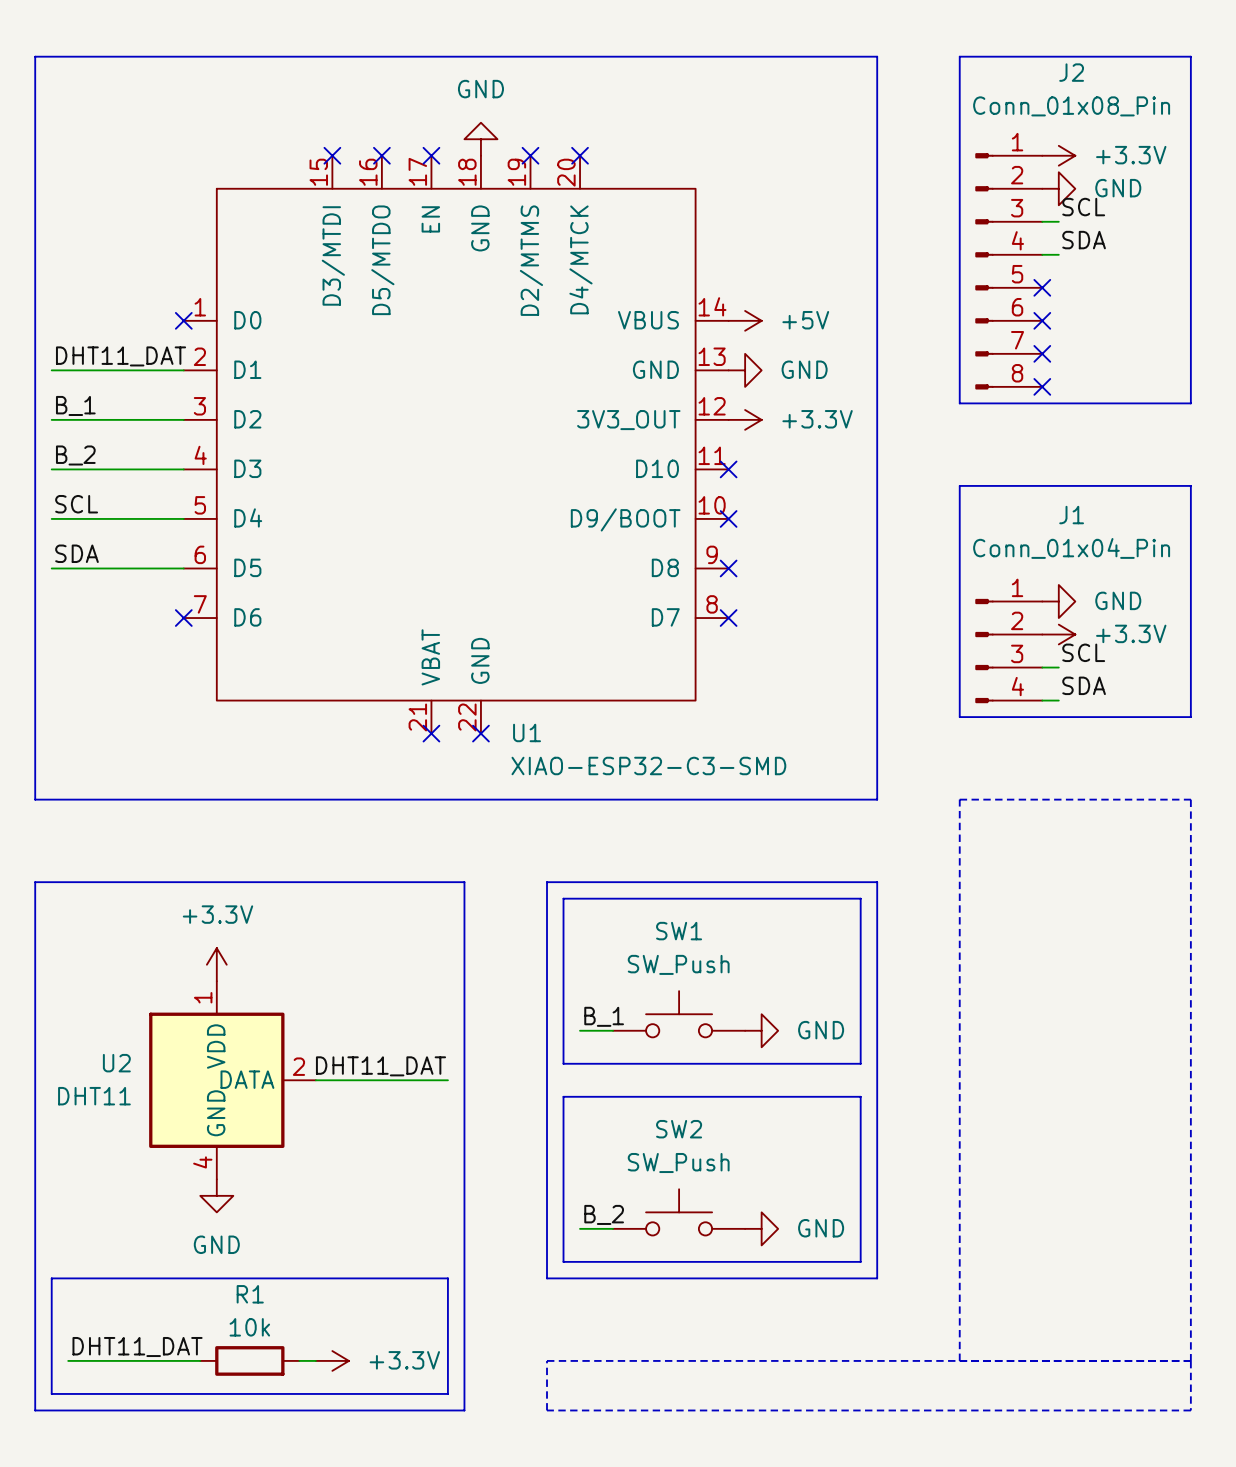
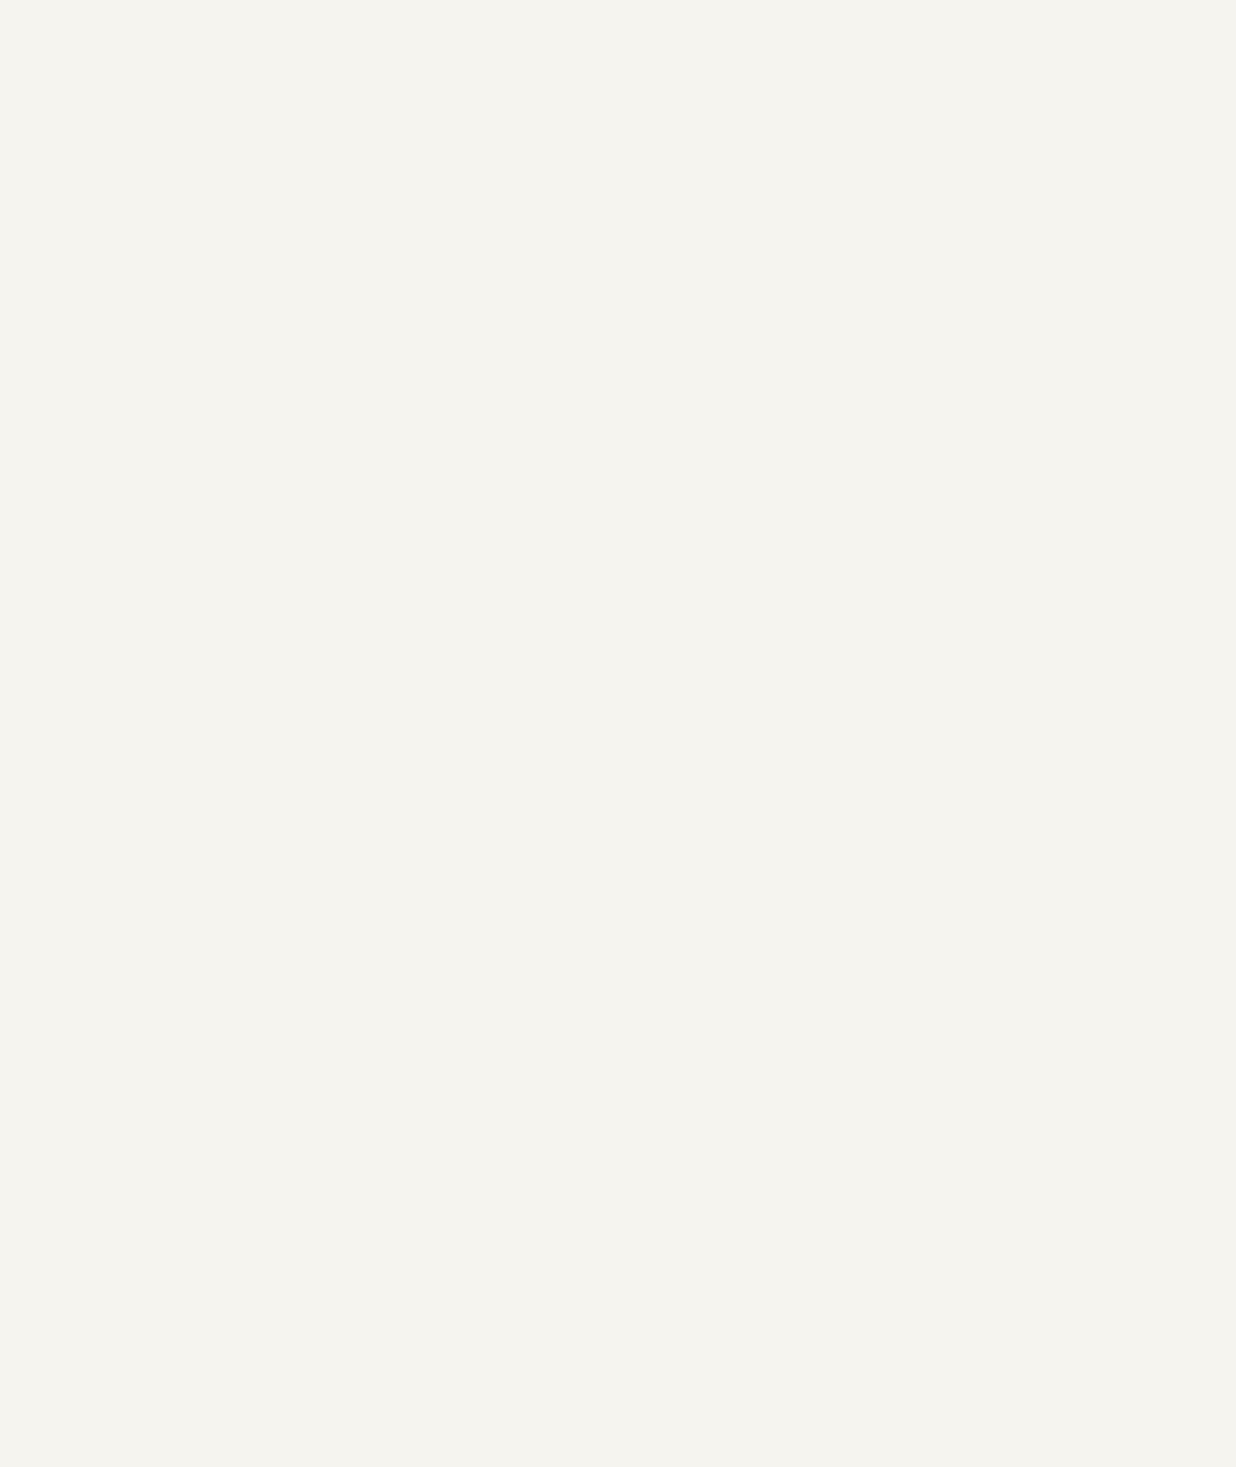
line: (35, 56) (877, 56) (877, 799) (35, 799) (35, 56) -> none
line: (959, 56) (1190, 56) (1190, 403) (959, 403) (959, 56) -> none
power symbol: GND (480, 139) -> none
no-connect mark: (332, 155) -> none
no-connect mark: (381, 155) -> none
no-connect mark: (431, 155) -> none
no-connect mark: (530, 155) -> none
no-connect mark: (580, 155) -> none
power symbol: +3.3V (1058, 155) -> none
power symbol: GND (1058, 188) -> none
label: SCL (1083, 207) -> none
wire: (1042, 221) (1058, 221) -> none
label: SDA (1084, 240) -> none
wire: (1042, 254) (1058, 254) -> none
J2: Conn_01x08_Pin (1008, 271) -> none
no-connect mark: (1042, 287) -> none
no-connect mark: (183, 320) -> none
power symbol: +5V (745, 320) -> none
no-connect mark: (1042, 320) -> none
no-connect mark: (1042, 353) -> none
label: DHT11_DAT (121, 356) -> none
wire: (51, 370) (183, 370) -> none
power symbol: GND (745, 370) -> none
no-connect mark: (1042, 386) -> none
label: B_1 (75, 405) -> none
wire: (51, 419) (183, 419) -> none
power symbol: +3.3V (745, 419) -> none
U1: XIAO-ESP32-C3-SMD (456, 444) -> none
label: B_2 (75, 455) -> none
wire: (51, 469) (183, 469) -> none
no-connect mark: (728, 469) -> none
line: (959, 485) (959, 717) (1190, 717) (1190, 485) (959, 485) -> none
label: SCL (76, 504) -> none
wire: (51, 518) (183, 518) -> none
no-connect mark: (728, 518) -> none
label: SDA (77, 553) -> none
wire: (51, 568) (183, 568) -> none
no-connect mark: (728, 568) -> none
power symbol: GND (1058, 601) -> none
no-connect mark: (183, 618) -> none
no-connect mark: (728, 618) -> none
power symbol: +3.3V (1058, 634) -> none
J1: Conn_01x04_Pin (1008, 651) -> none
label: SCL (1083, 652) -> none
wire: (1042, 667) (1058, 667) -> none
label: SDA (1084, 685) -> none
wire: (1042, 700) (1058, 700) -> none
no-connect mark: (431, 733) -> none
no-connect mark: (480, 733) -> none
line: (35, 882) (35, 1410) (464, 1410) (464, 882) (35, 882) -> none
line: (547, 882) (877, 882) (877, 1278) (547, 1278) (547, 882) -> none
line: (563, 898) (563, 1063) (860, 1063) (860, 898) (563, 898) -> none
power symbol: +3.3V (216, 964) -> none
SW1: SW_Push (679, 1014) -> none
label: B_1 (604, 1016) -> none
wire: (580, 1030) (613, 1030) -> none
power symbol: GND (761, 1030) -> none
label: DHT11_DAT (381, 1066) -> none
U2: DHT11 (232, 1080) -> none
wire: (315, 1080) (447, 1080) -> none
line: (563, 1096) (860, 1096) (860, 1261) (563, 1261) (563, 1096) -> none
power symbol: GND (216, 1195) -> none
SW2: SW_Push (679, 1212) -> none
label: B_2 (604, 1214) -> none
wire: (580, 1228) (613, 1228) -> none
power symbol: GND (761, 1228) -> none
line: (51, 1278) (447, 1278) (447, 1393) (51, 1393) (51, 1278) -> none
label: DHT11_DAT (137, 1347) -> none
wire: (68, 1360) (200, 1360) -> none
R1: 10k (249, 1360) -> none
wire: (299, 1360) (315, 1360) -> none
power symbol: +3.3V (332, 1360) -> none
line: (959, 1360) (959, 799) (1190, 799) (1190, 1410) (547, 1410) (547, 1360) (1190, 1360) -> none

